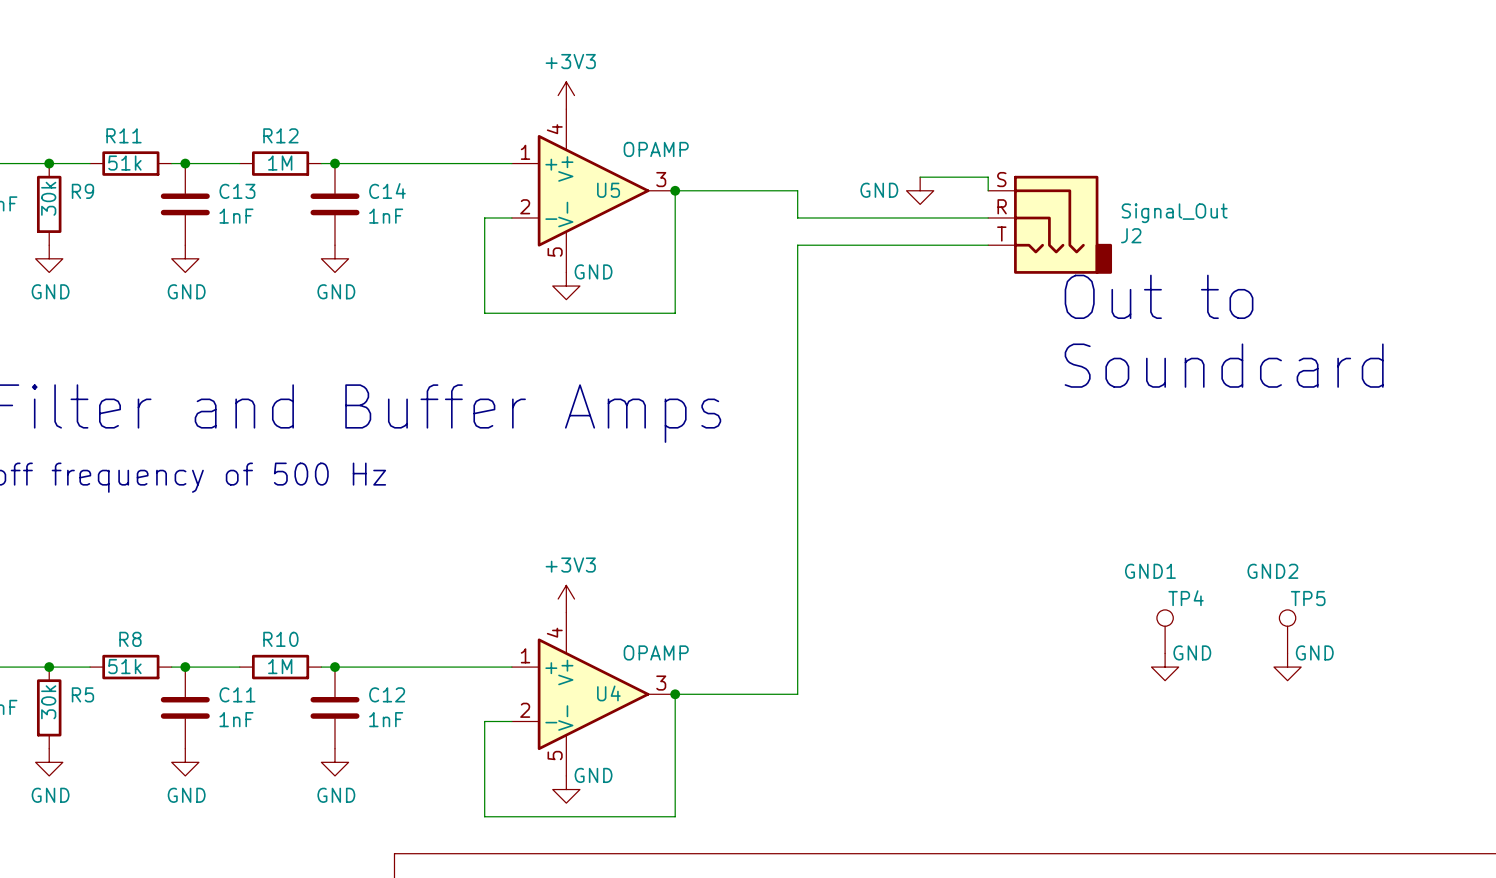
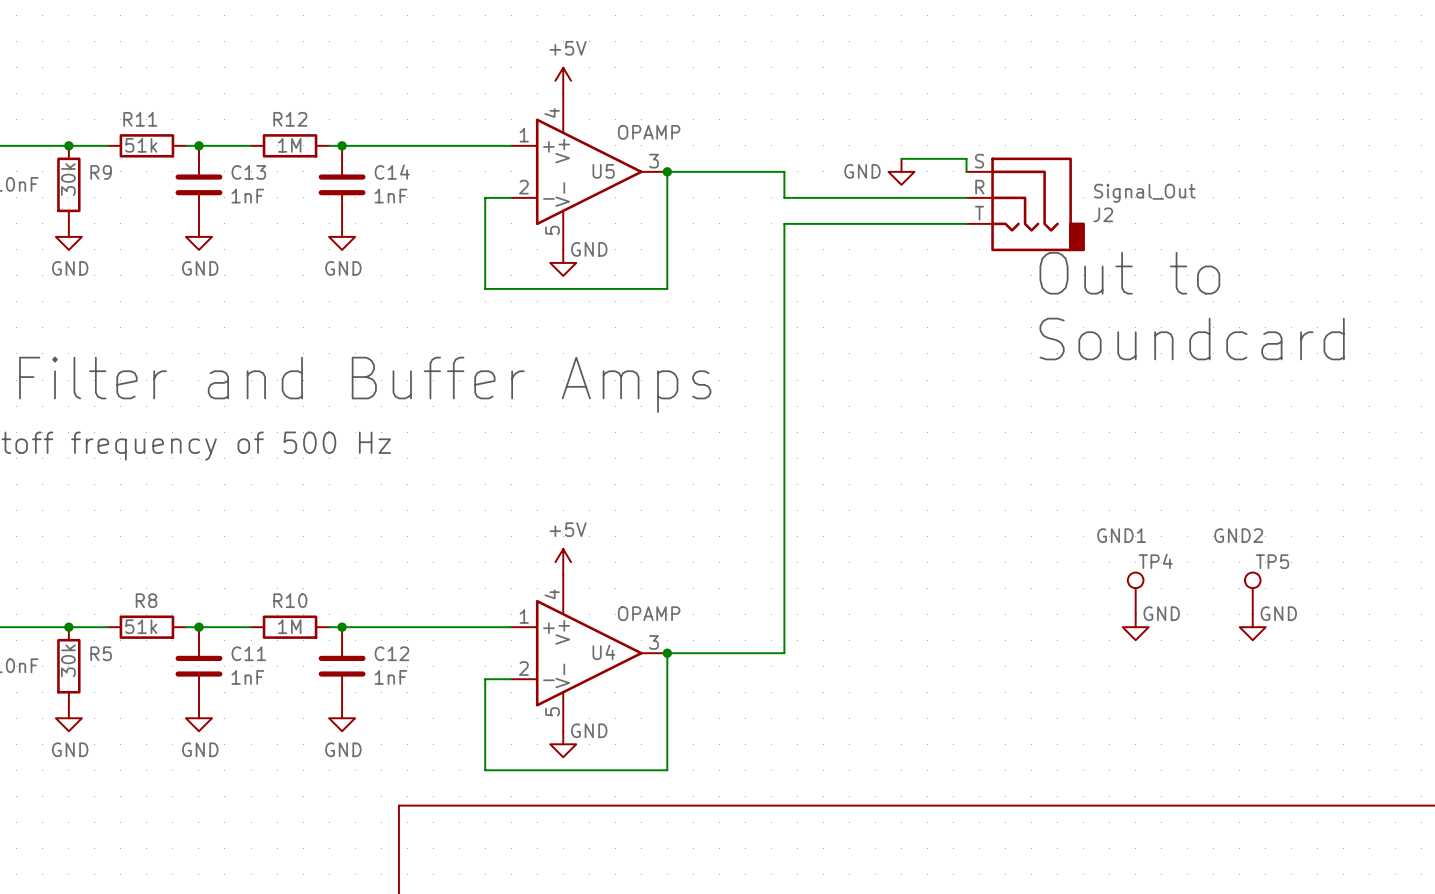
power symbol: +3V3 (566, 95) -> +5V (563, 80)
power symbol: +3V3 (566, 599) -> +5V (563, 562)

